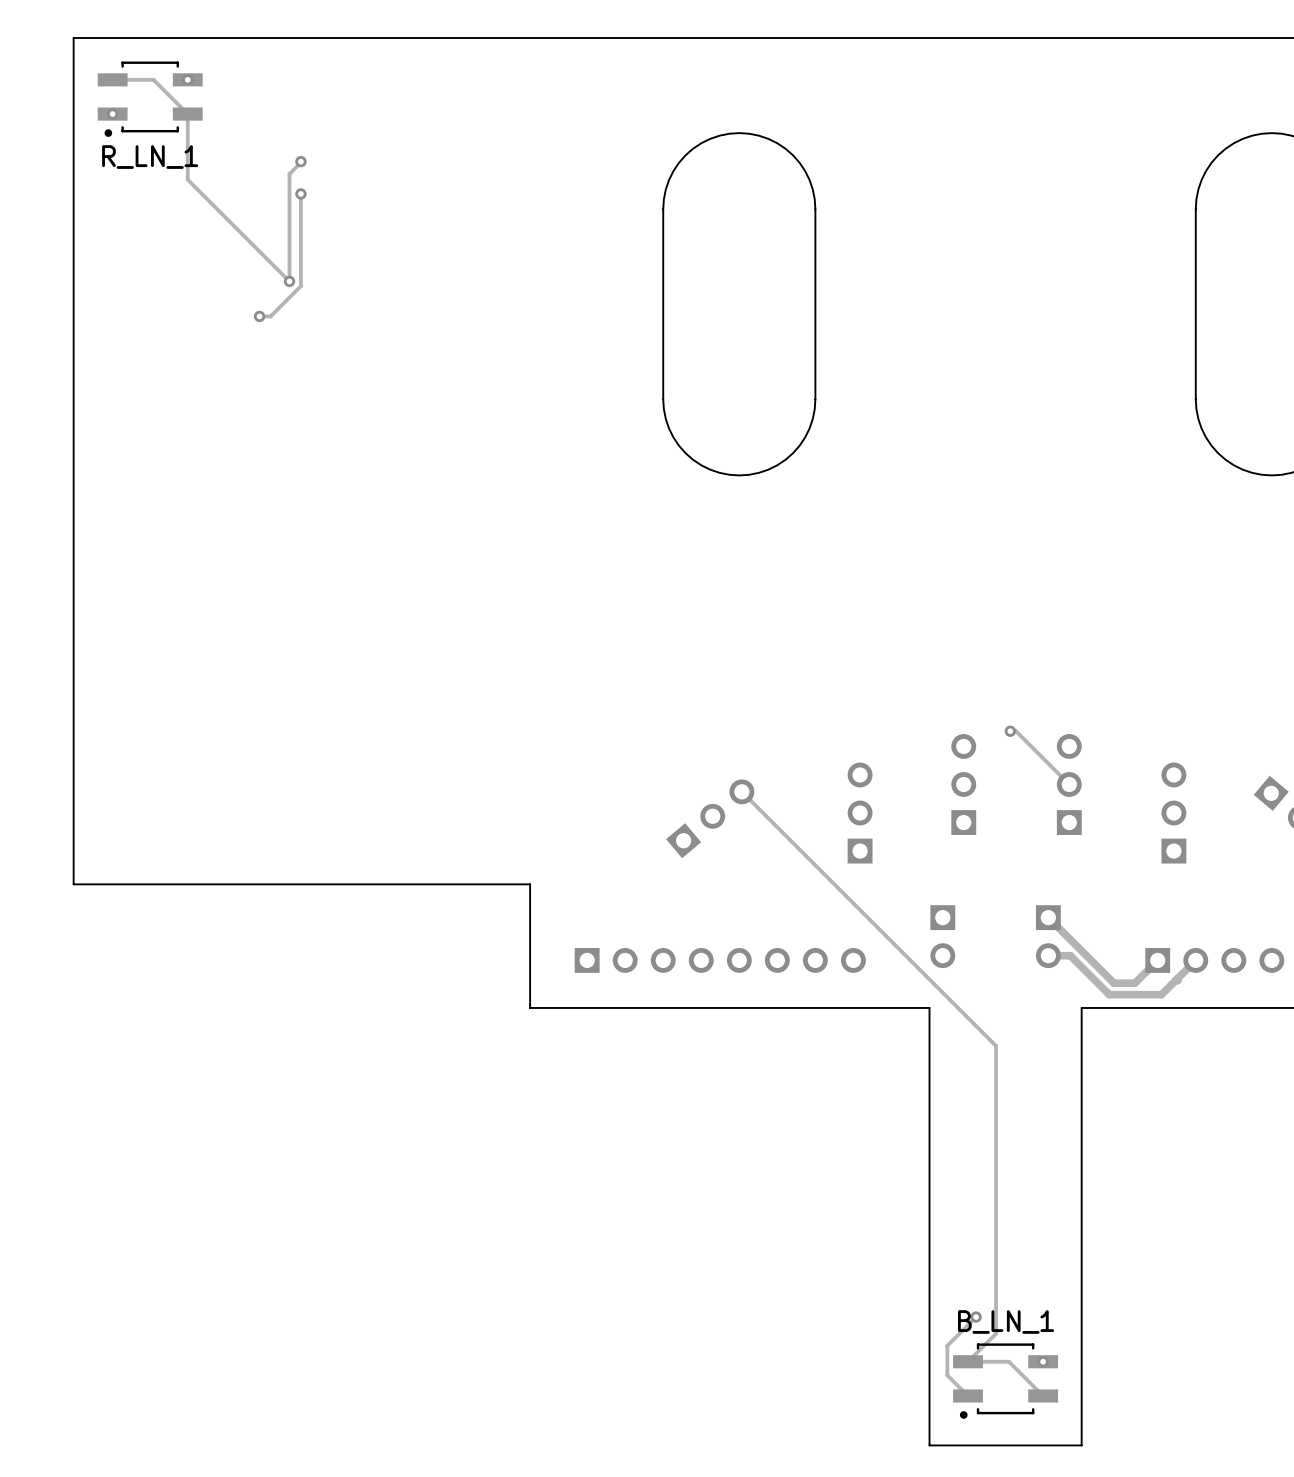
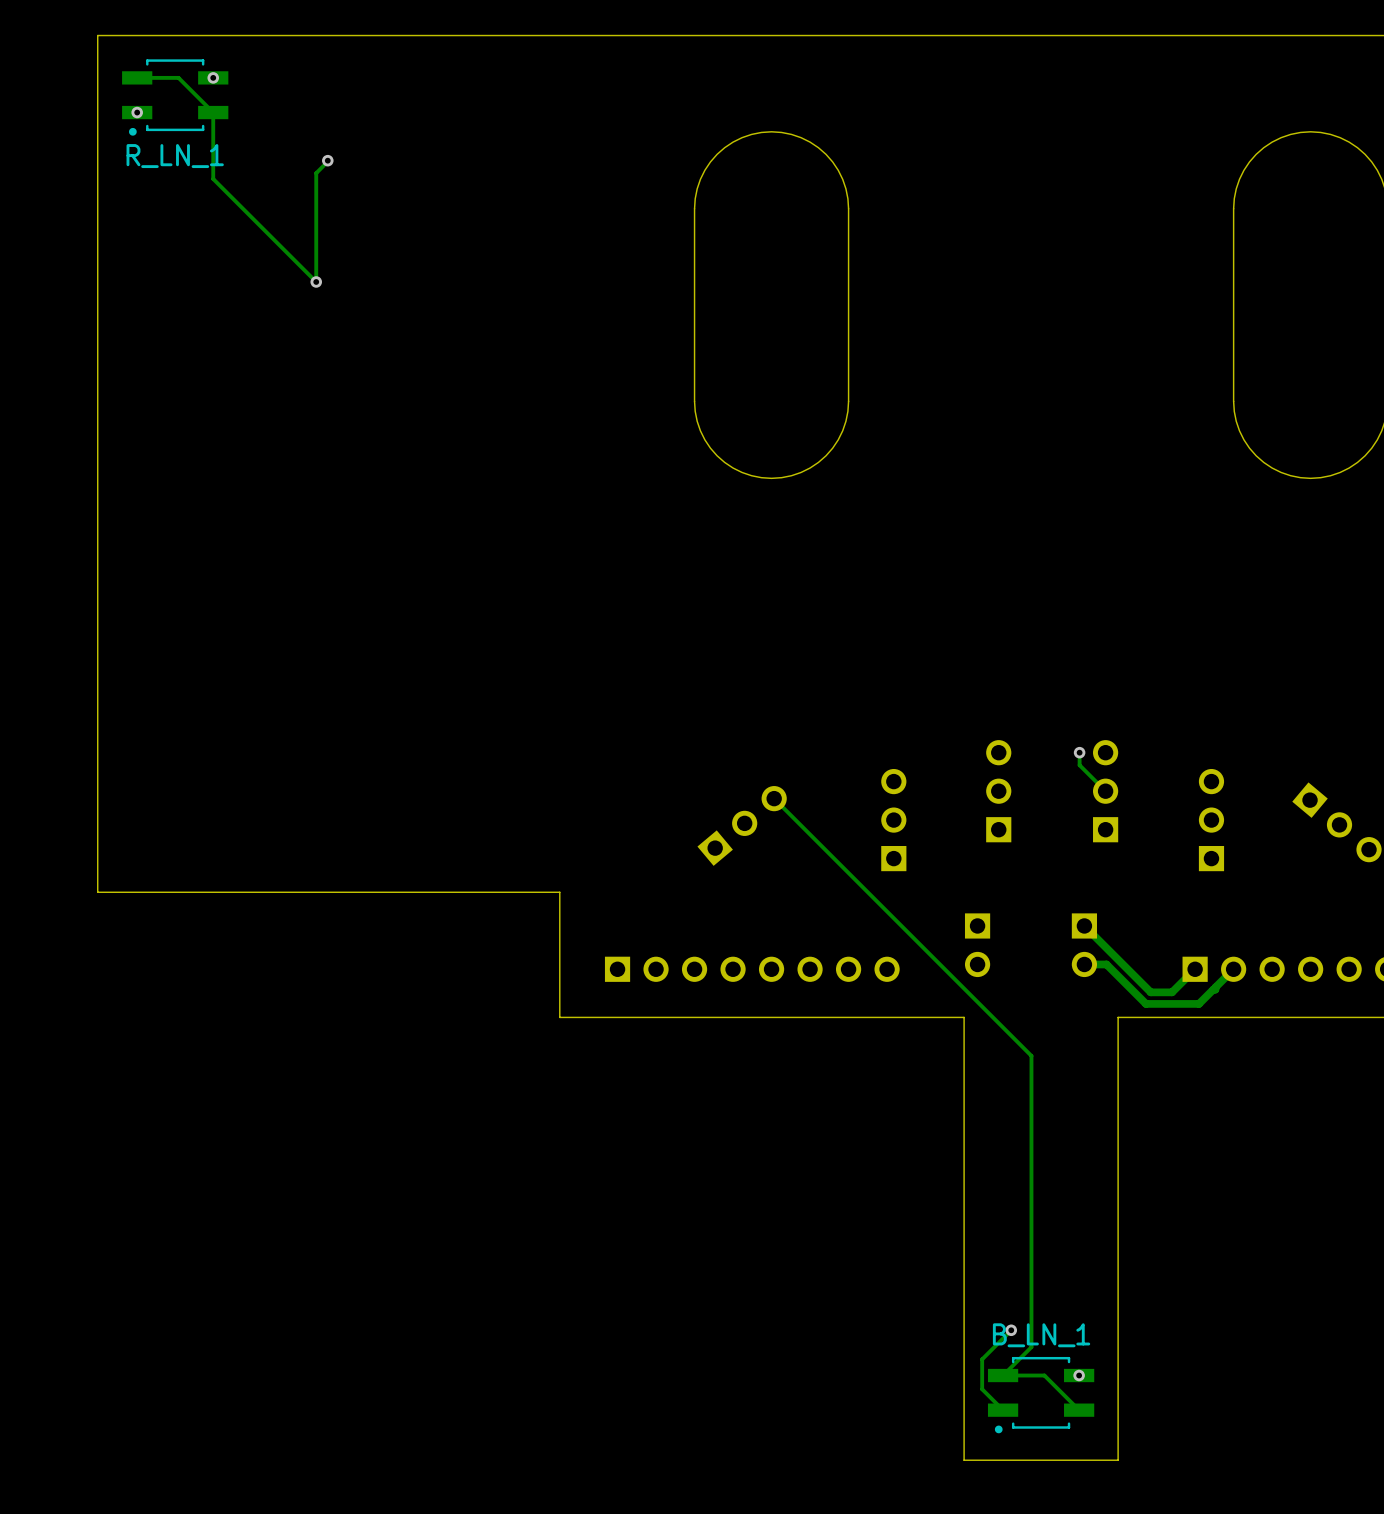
track: (300, 193) (300, 286) (270, 316) (259, 316) -> none
via: (300, 193) -> none
via: (259, 316) -> none
track: (1010, 731) (1016, 731) (1043, 758) -> (1079, 752) (1079, 765)
via position: (1010, 731) -> (1079, 752)

